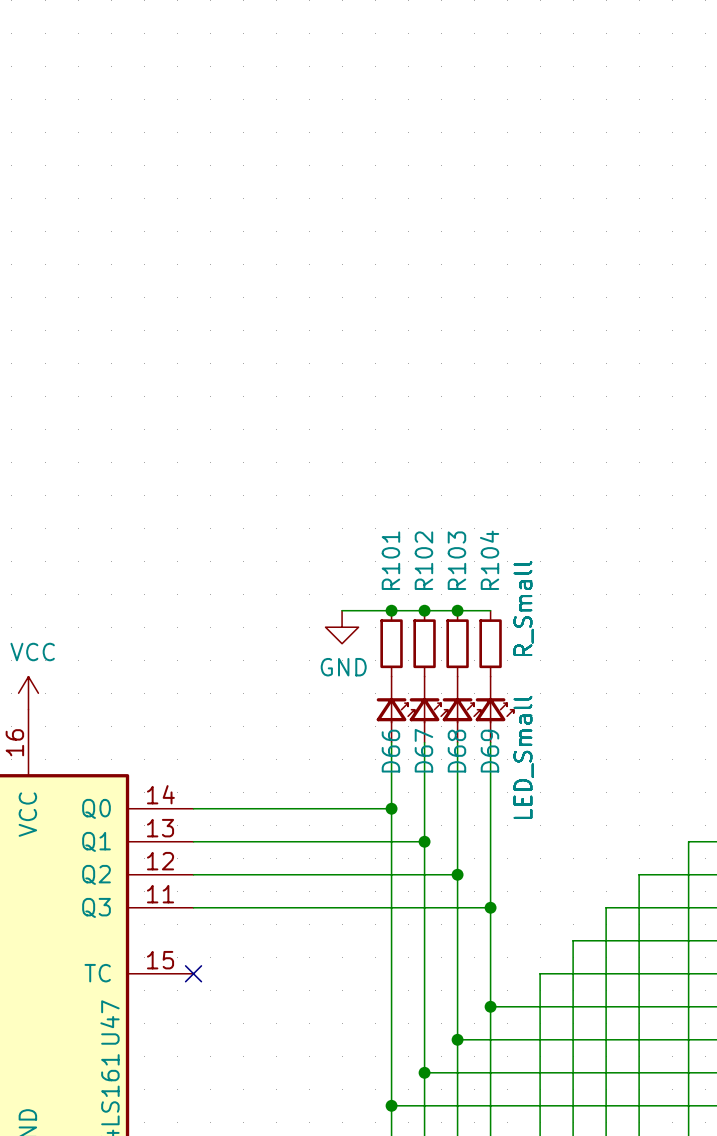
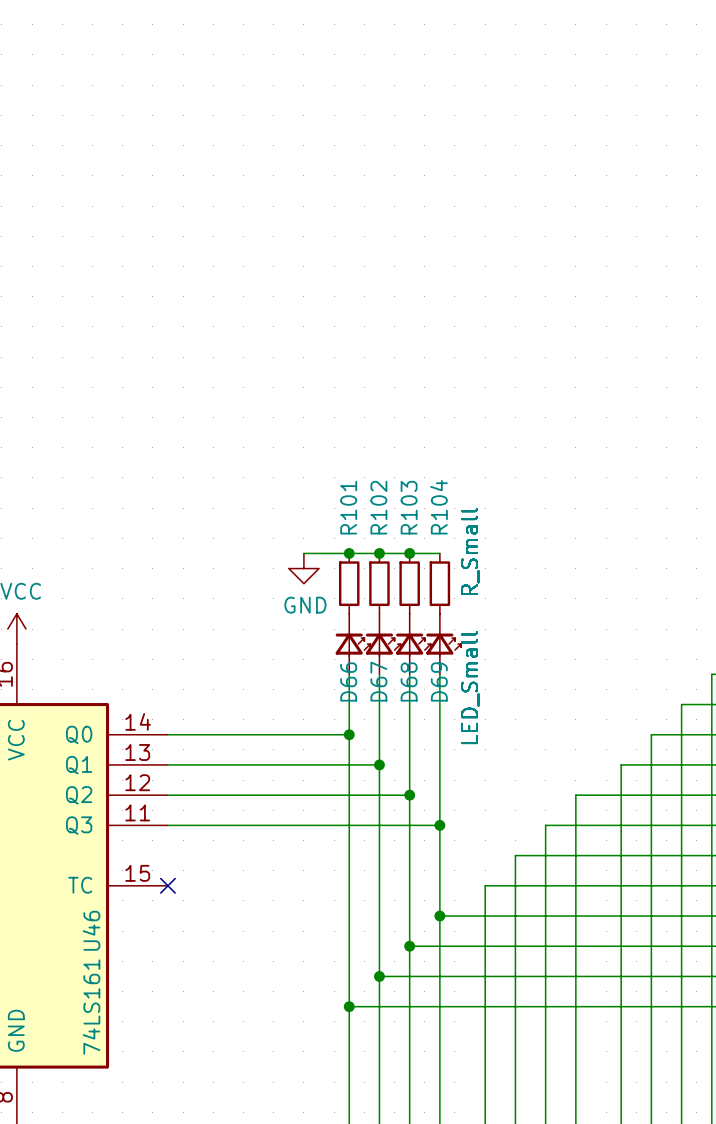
U47 name: U47 (110, 1022) -> U46 (91, 930)

